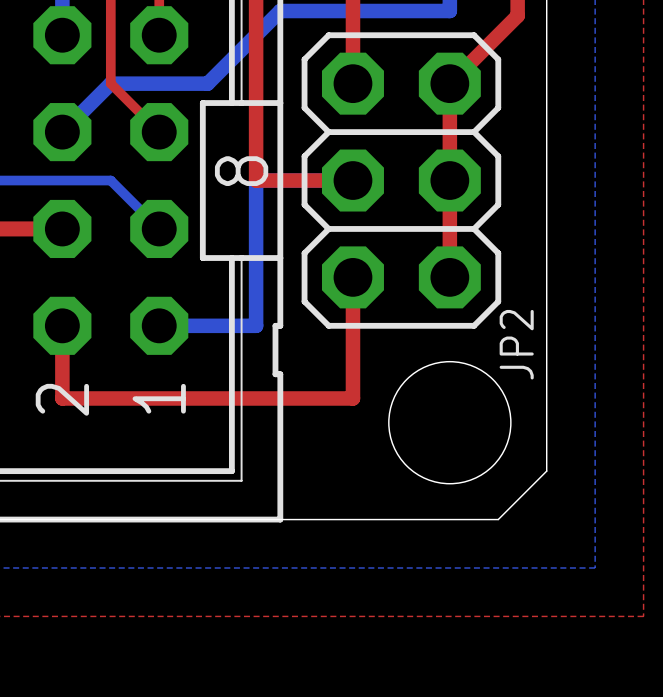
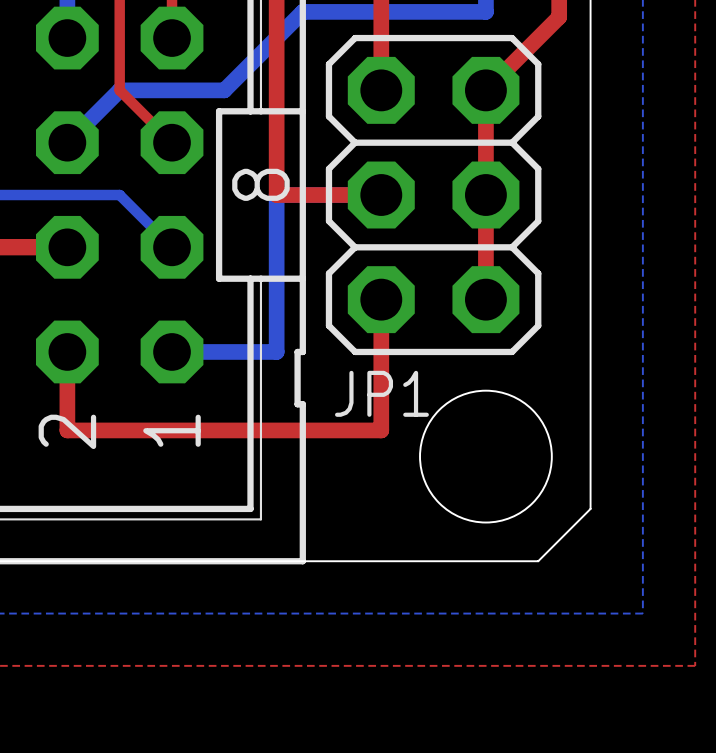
JP2 name: JP2 (516, 344) -> JP1 (381, 393)

